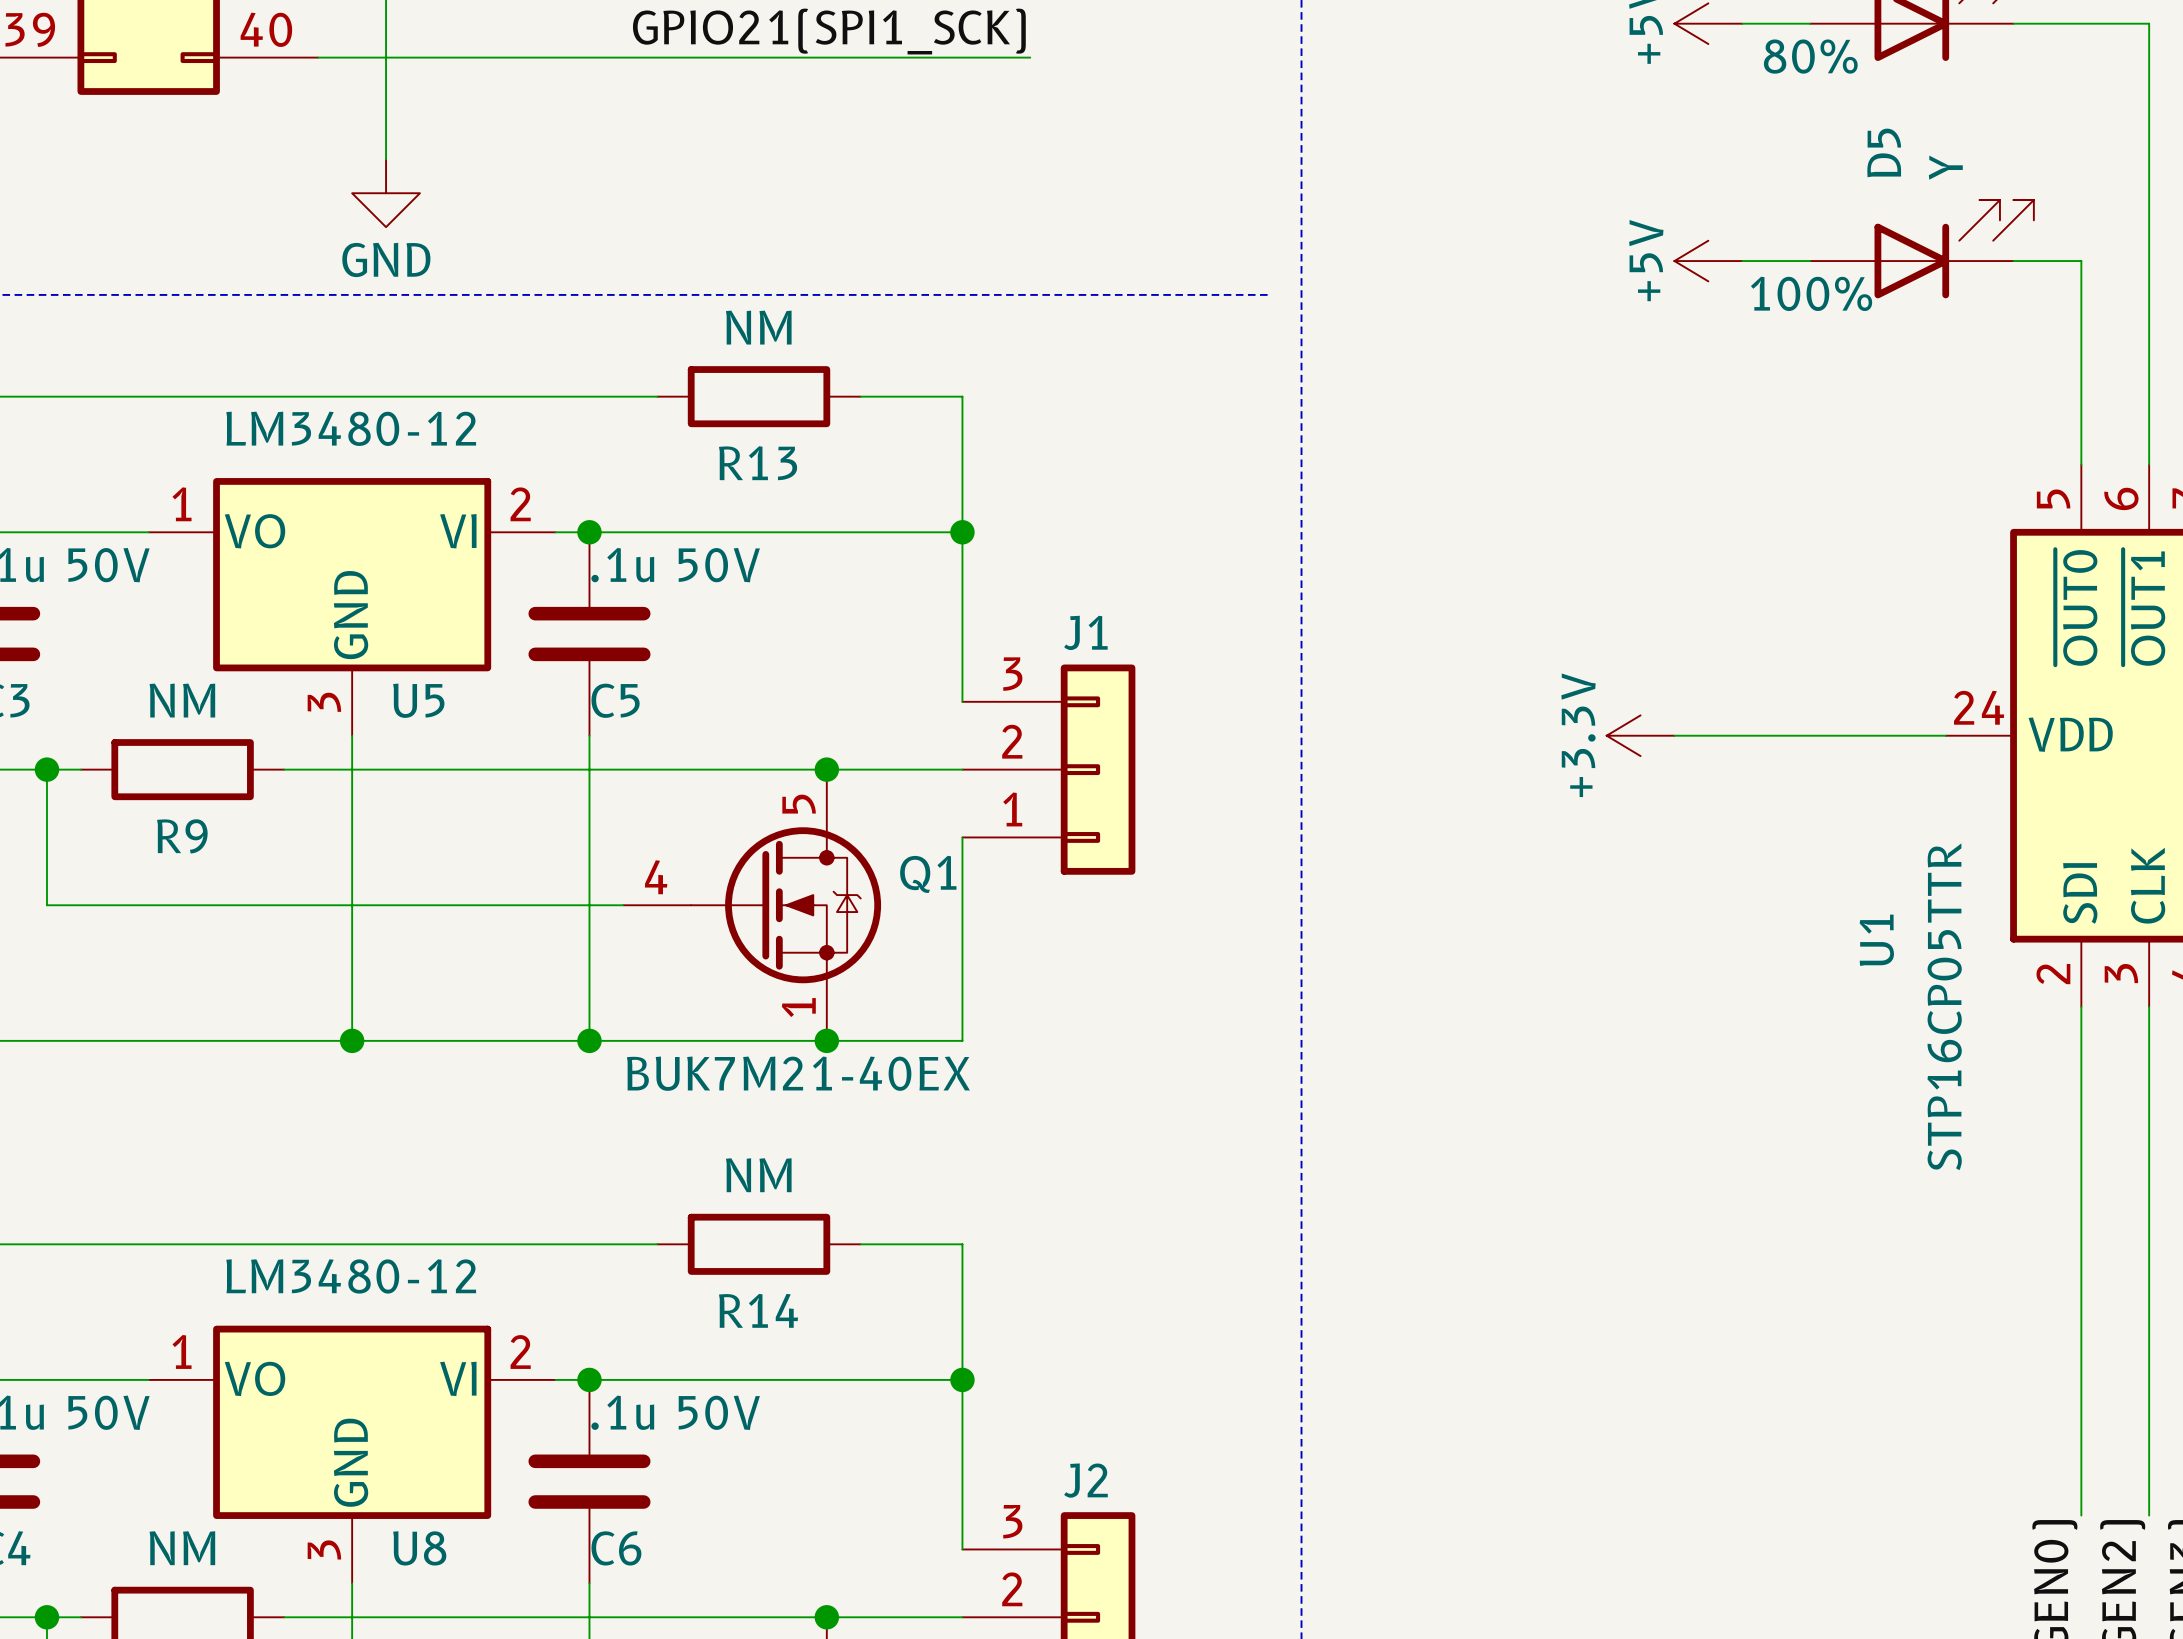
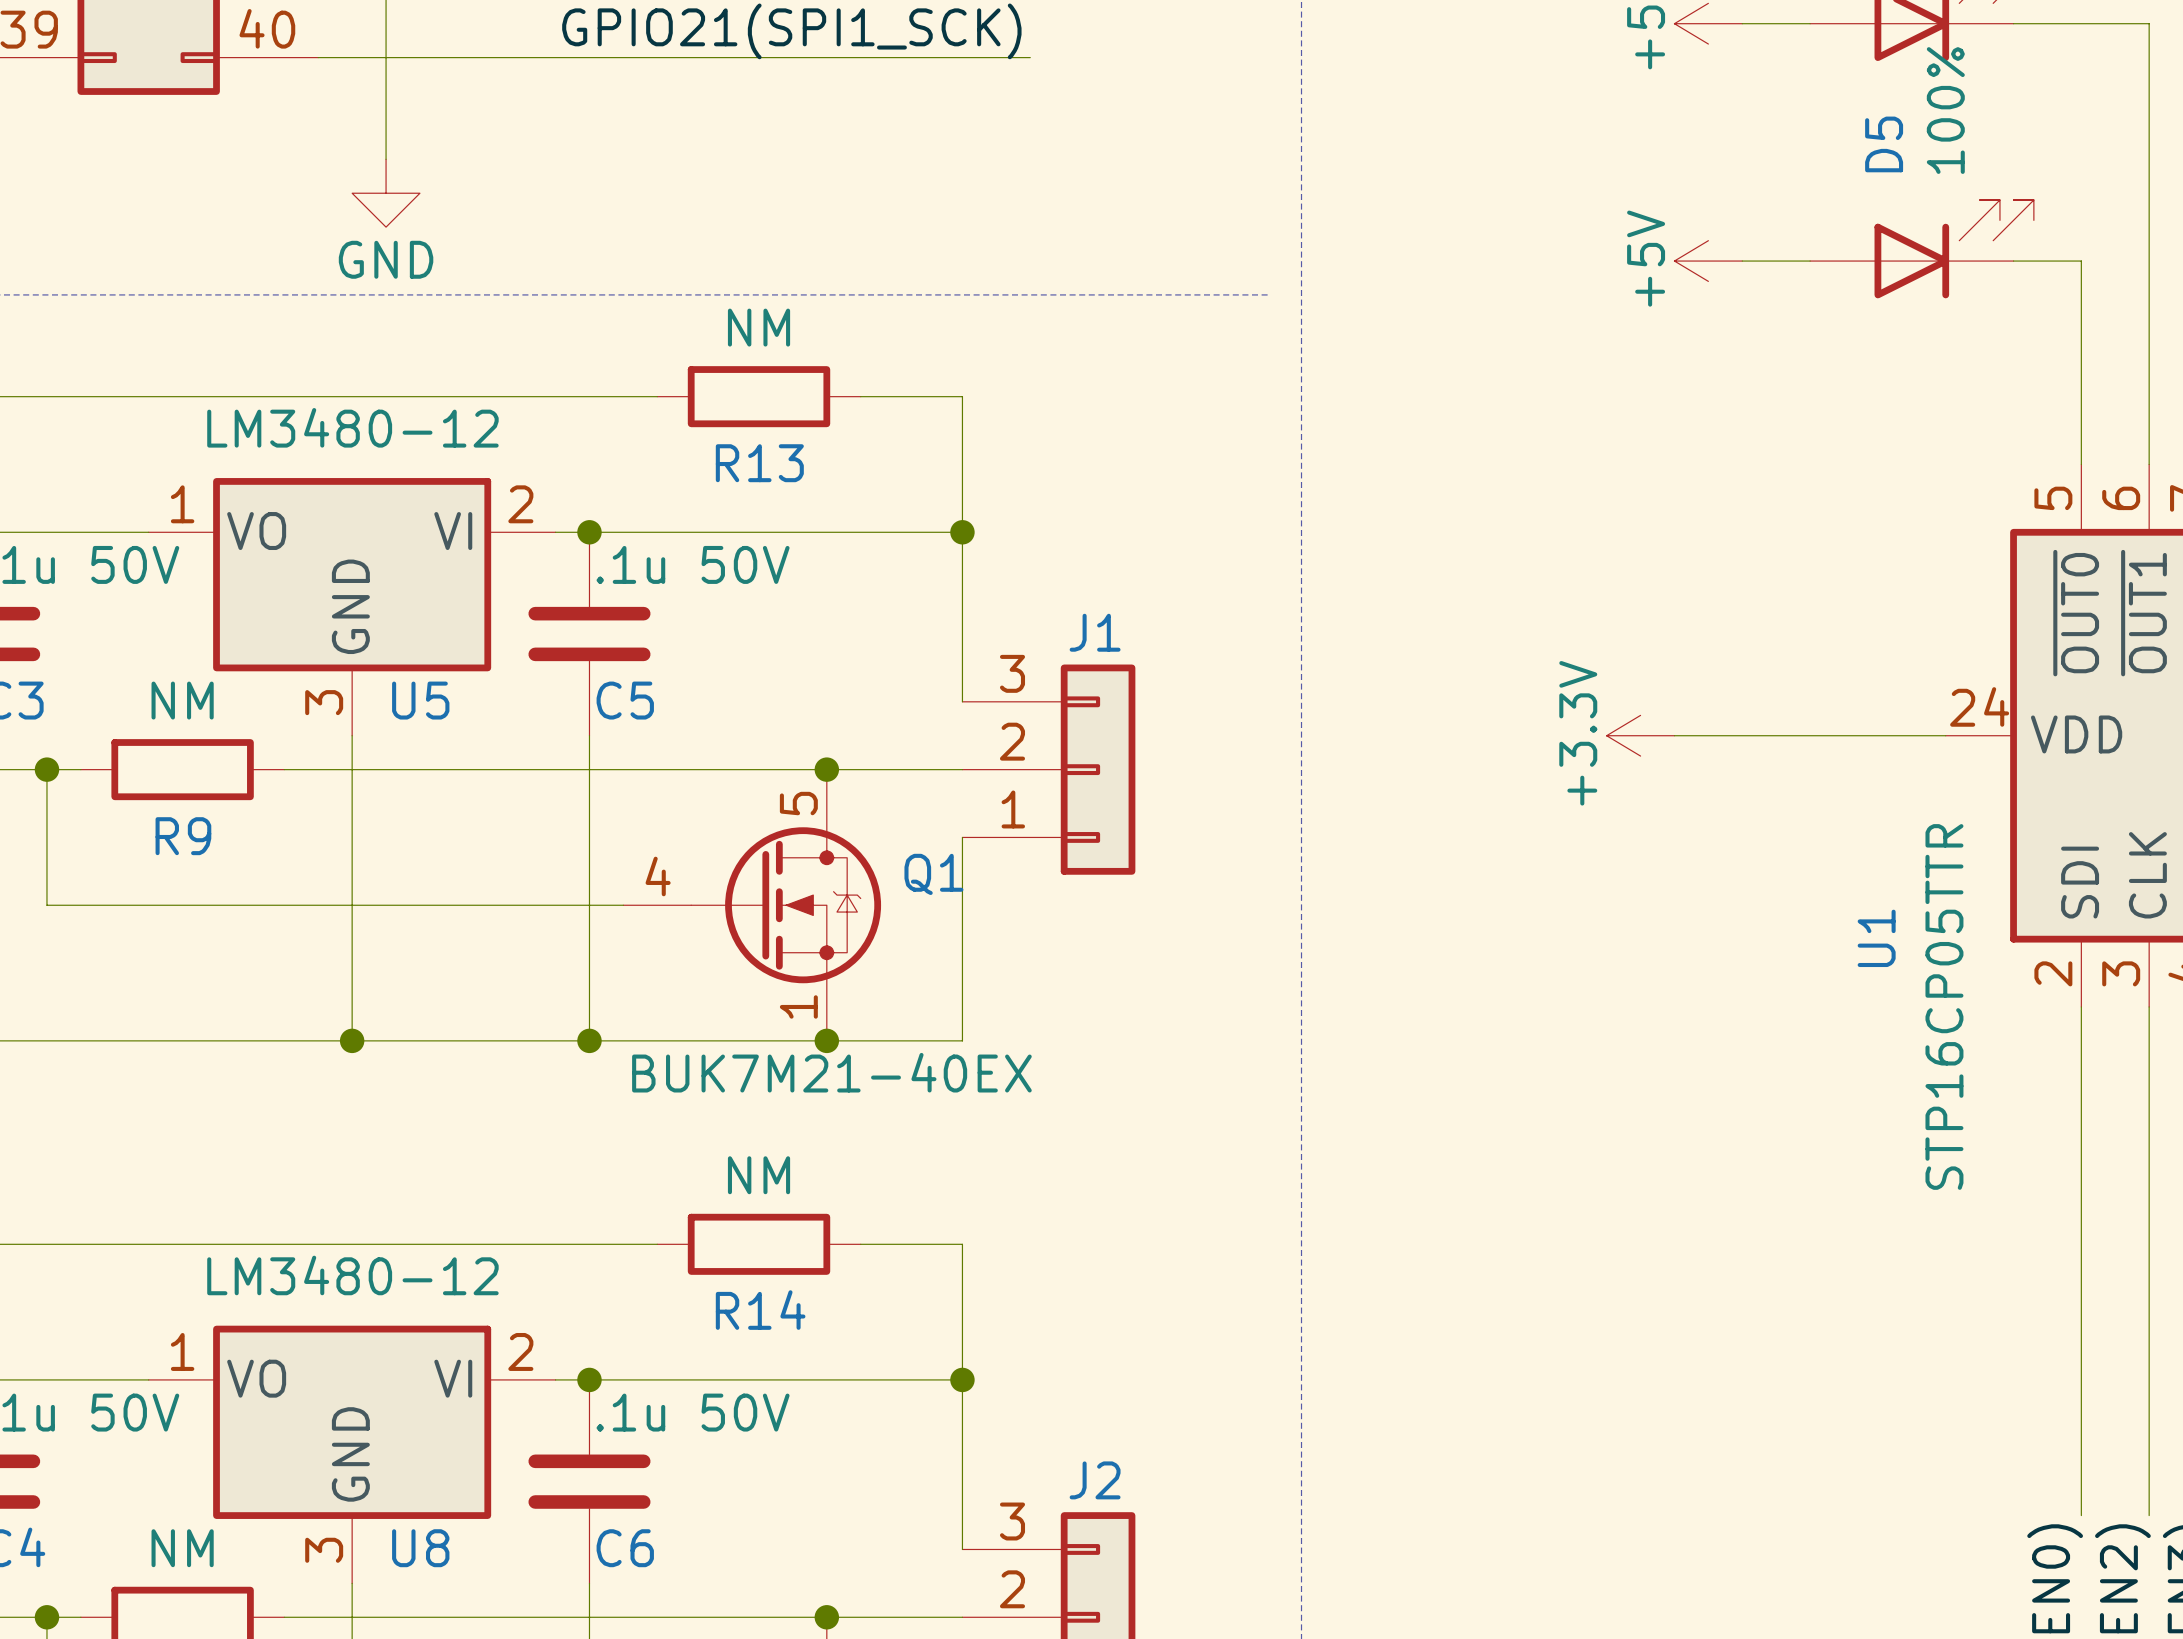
part text: 80% (1810, 56) -> none
D5 value: Y (1945, 167) -> 100% (1945, 110)
D5 text: 100% (1811, 293) -> none

